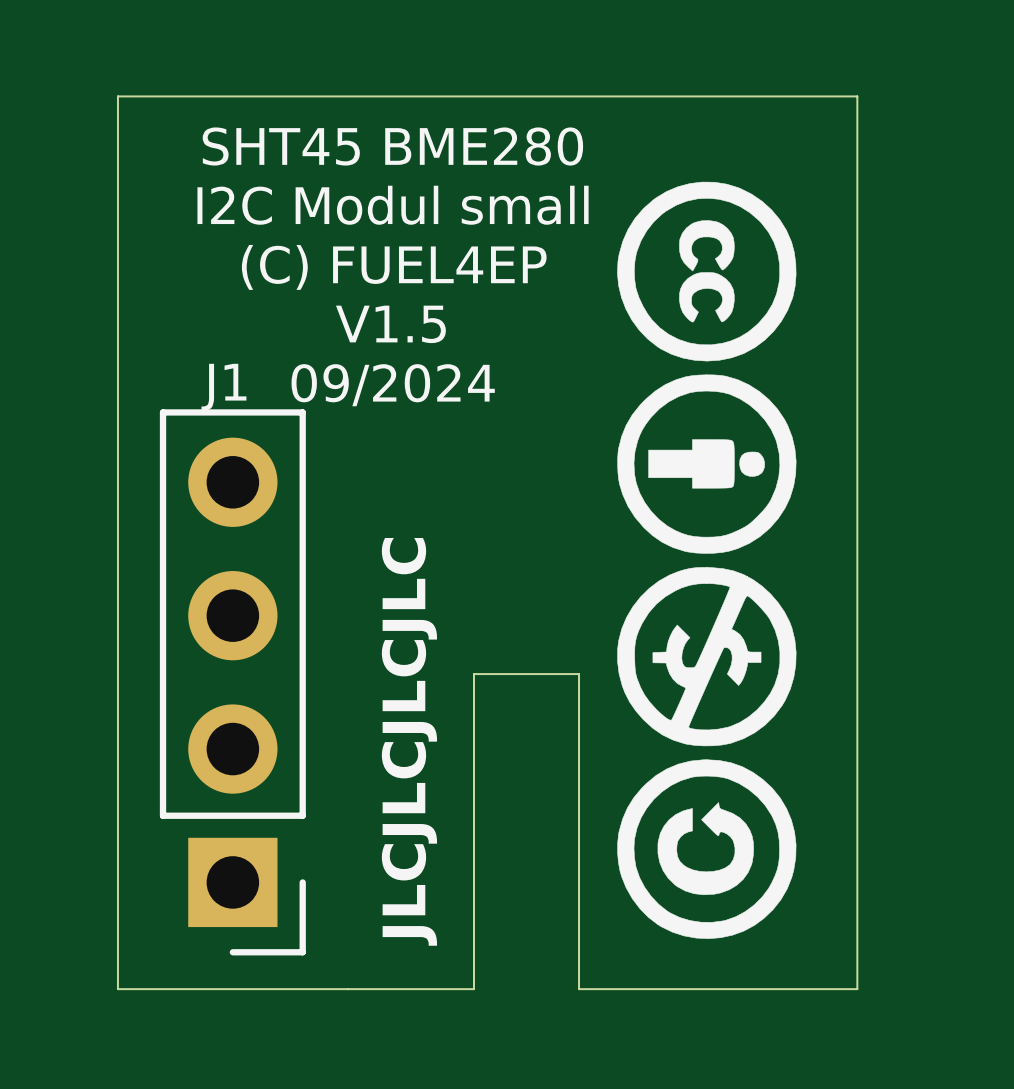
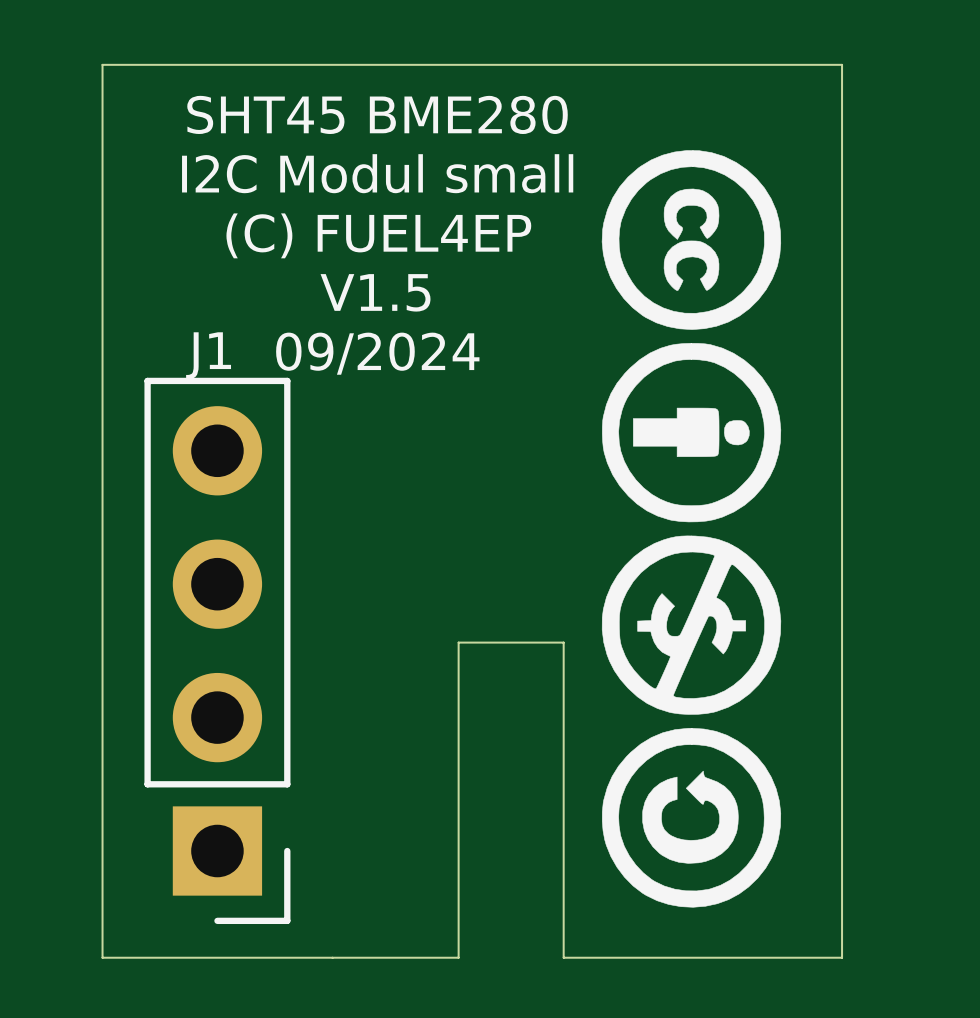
text: JLCJLCJLCJLC (409, 741) -> none

